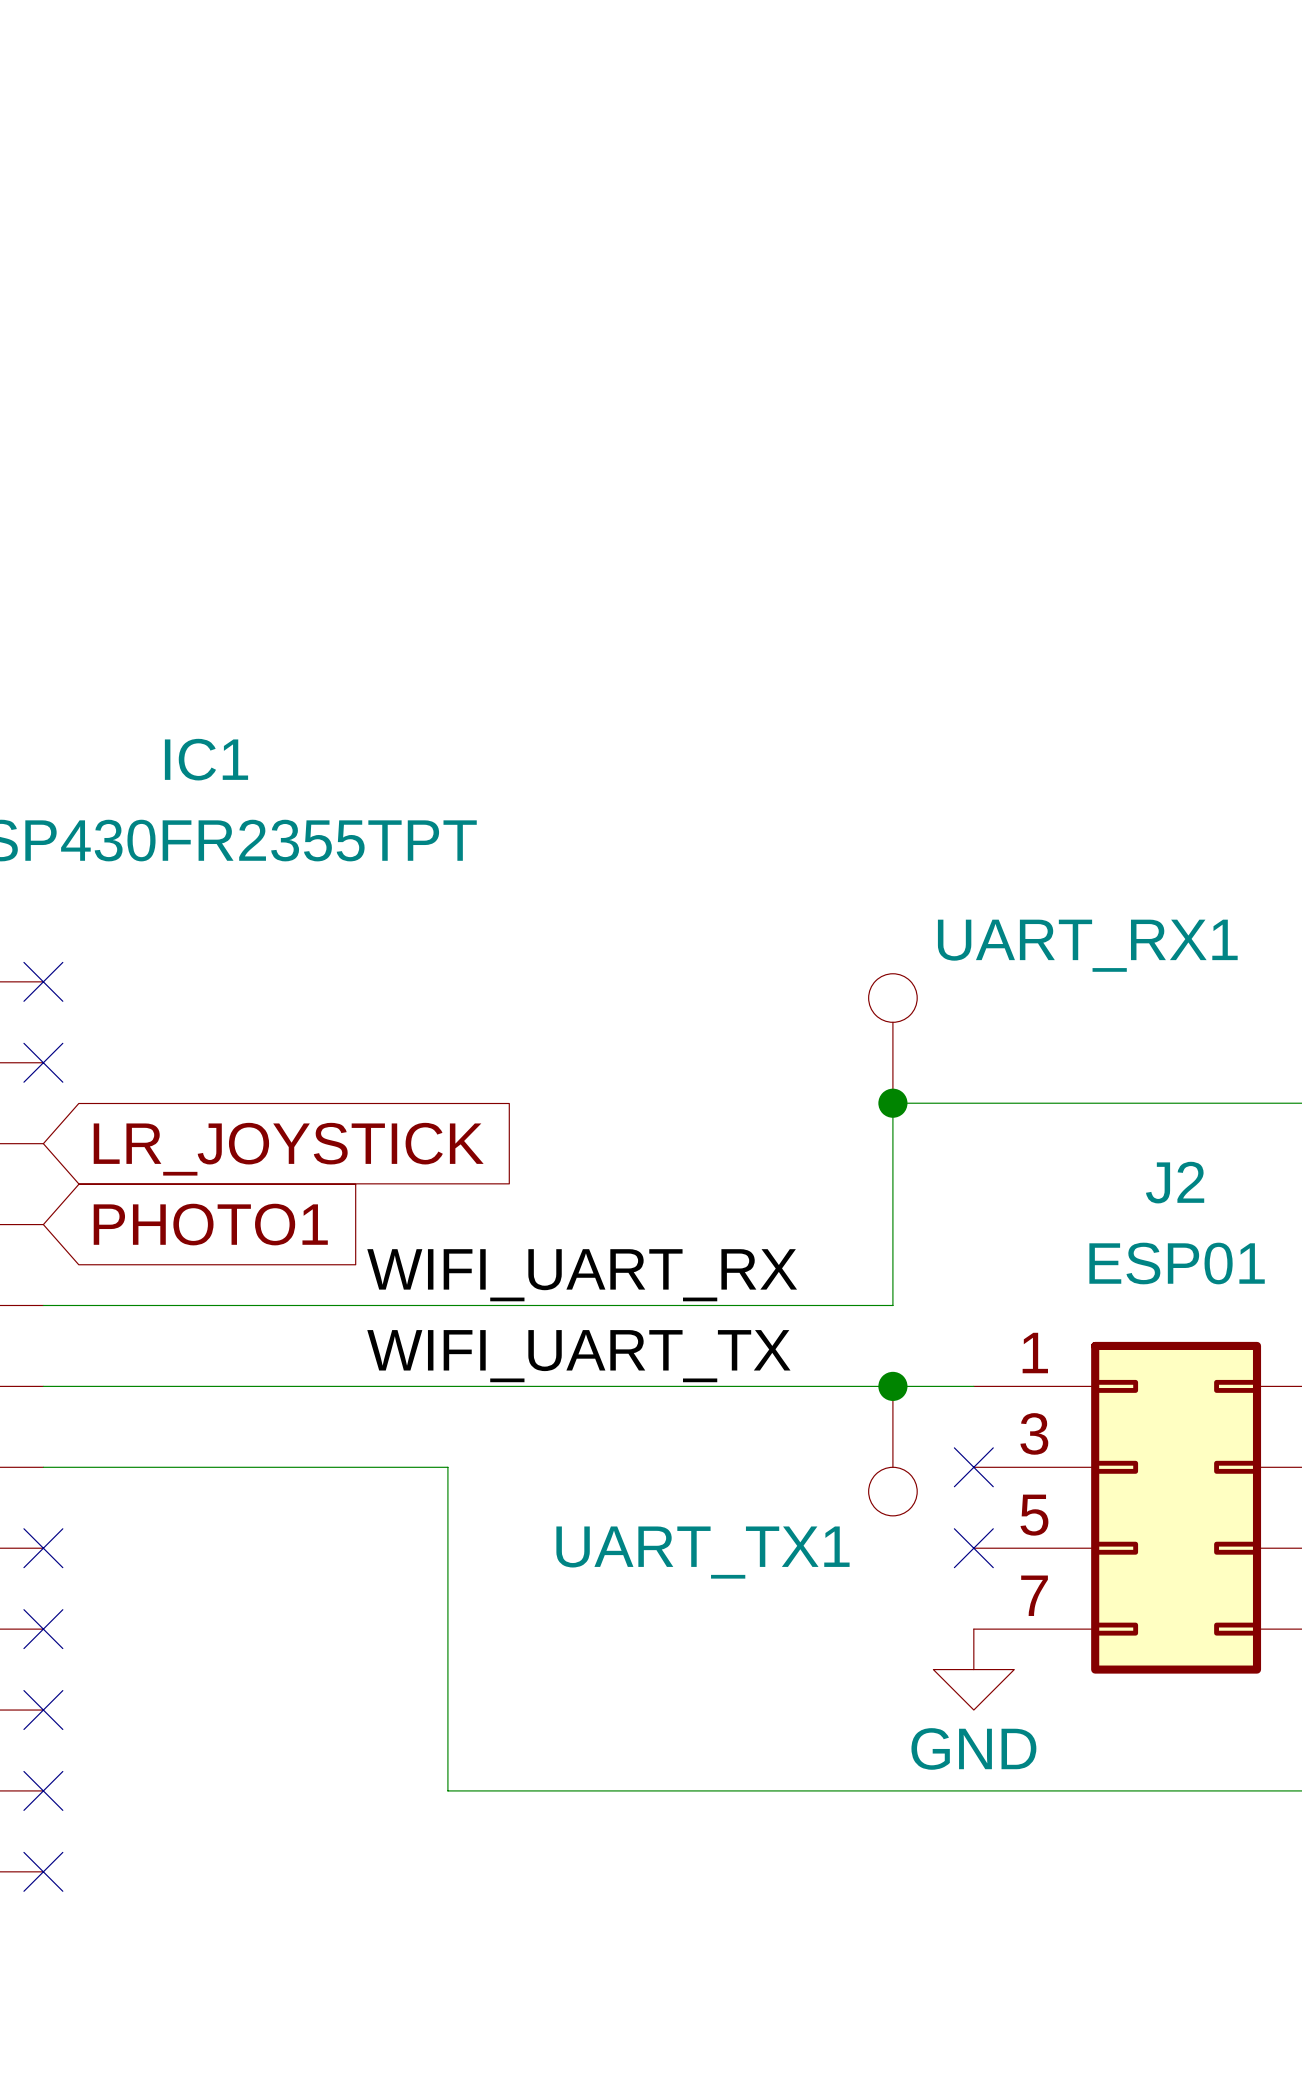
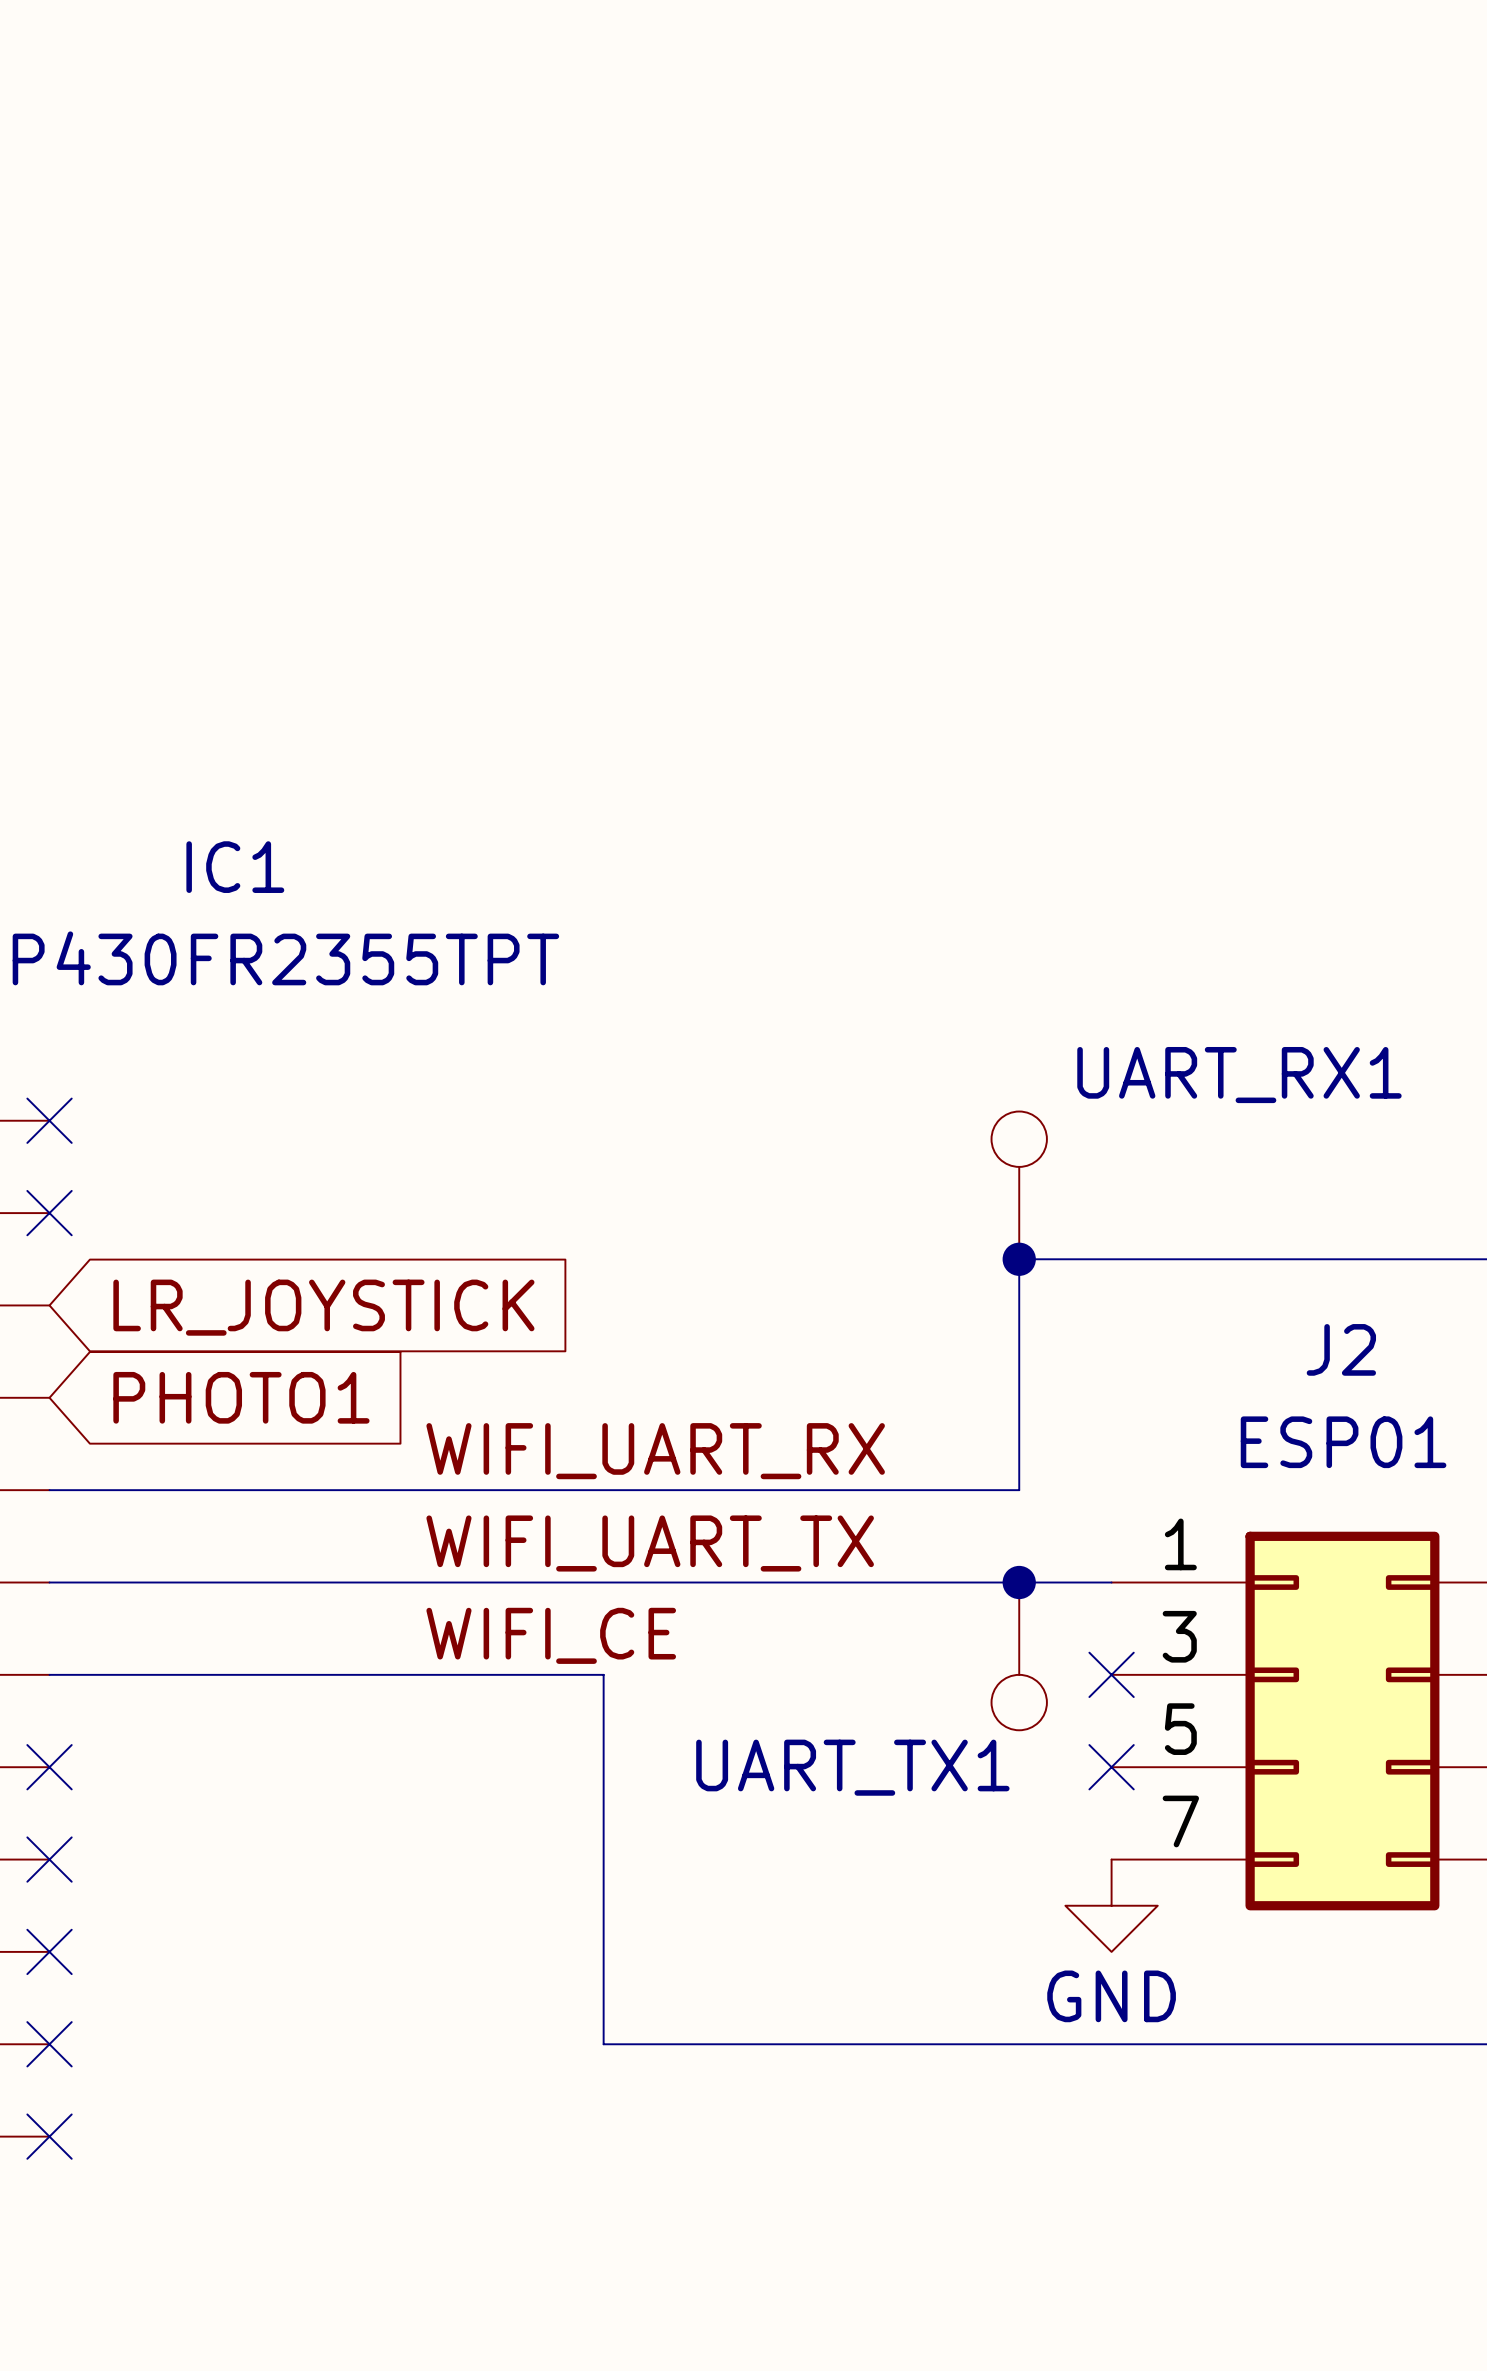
label: none -> WIFI_CE (551, 1635)
wire: (447, 1467) (447, 1790) (528, 1790) -> (511, 1674) (603, 1674) (603, 2044)
UART_TX1 name position: UART_TX1 (702, 1552) -> UART_TX1 (852, 1767)

